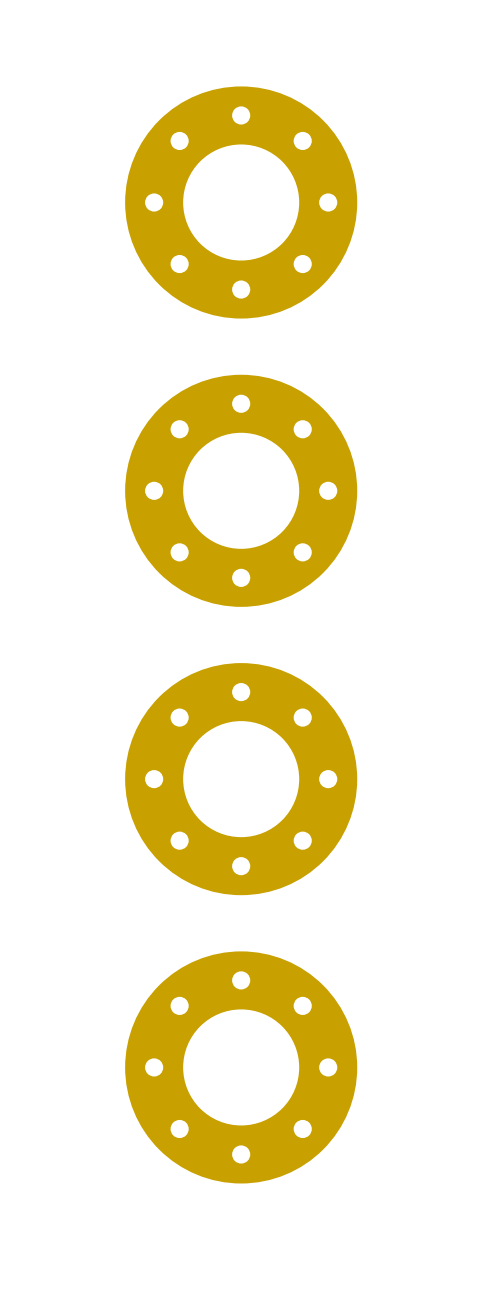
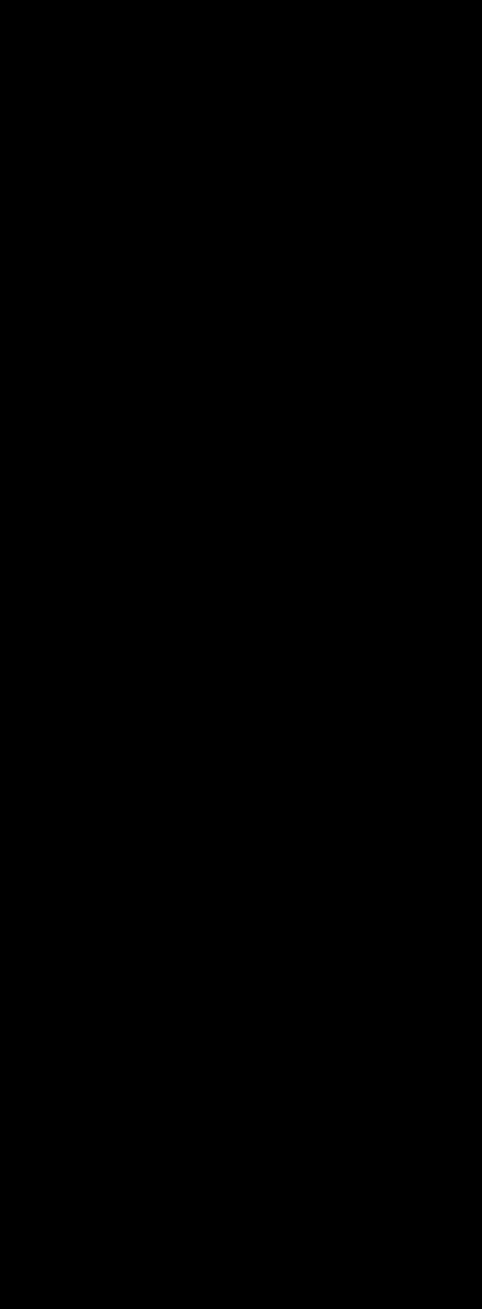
part: (241, 202) -> none
part: (241, 490) -> none
part: (241, 779) -> none
part: (241, 1067) -> none

